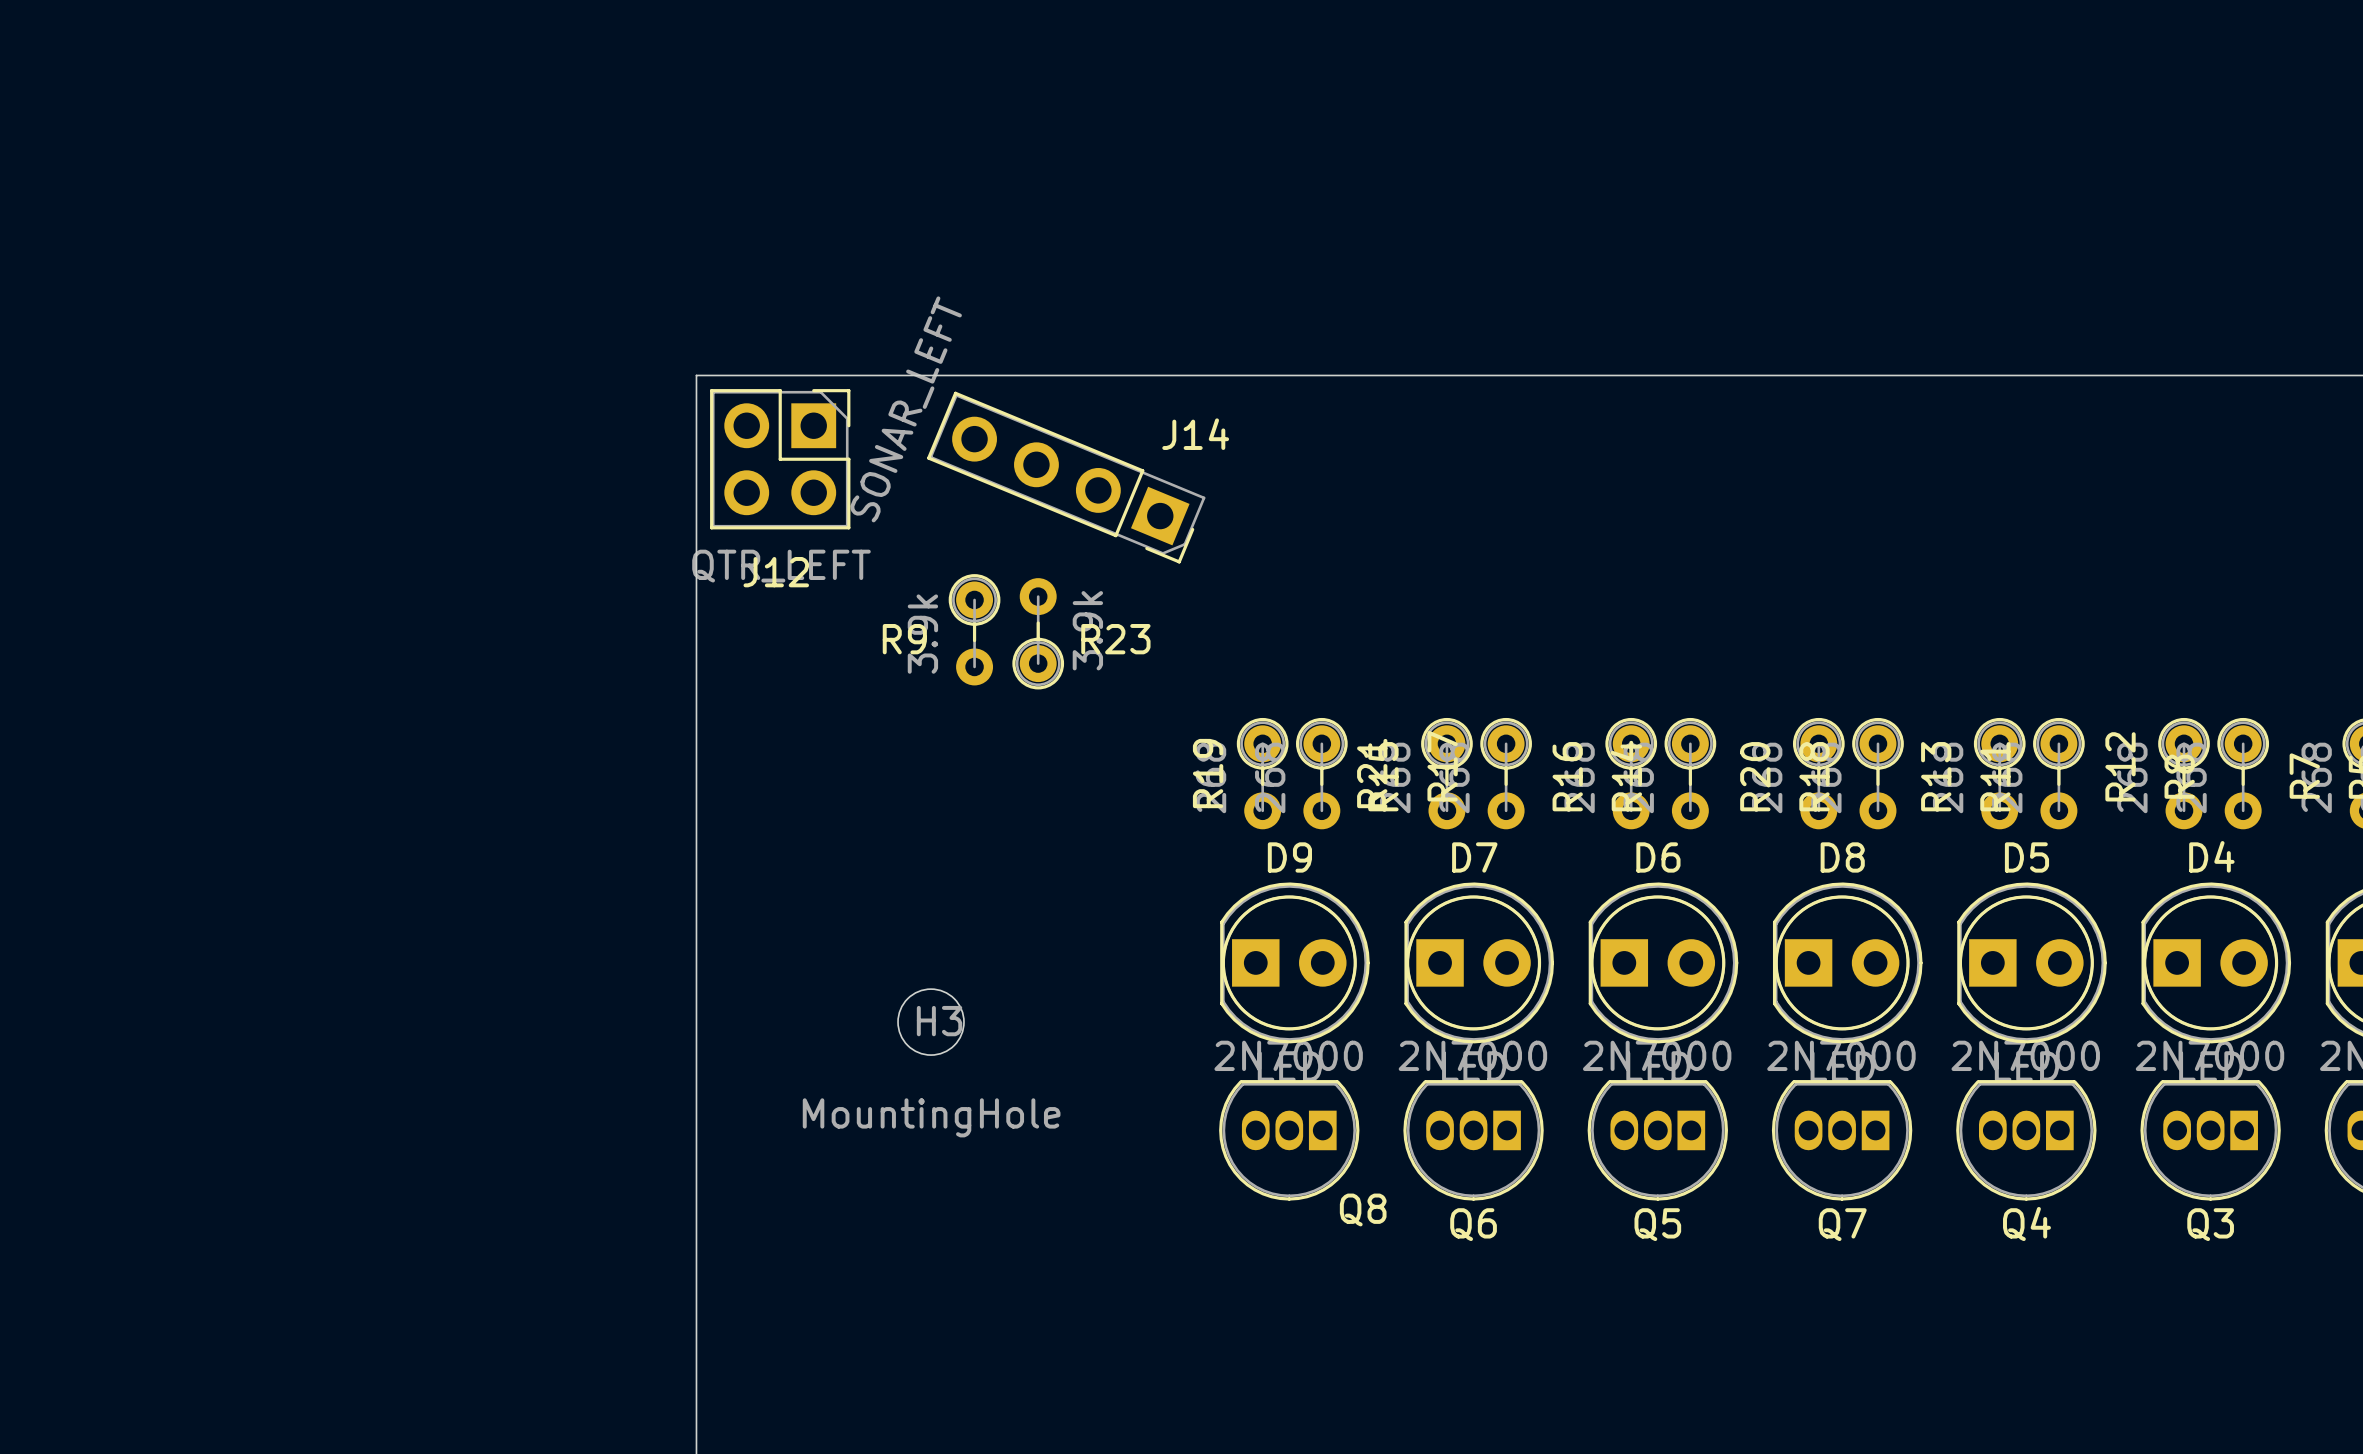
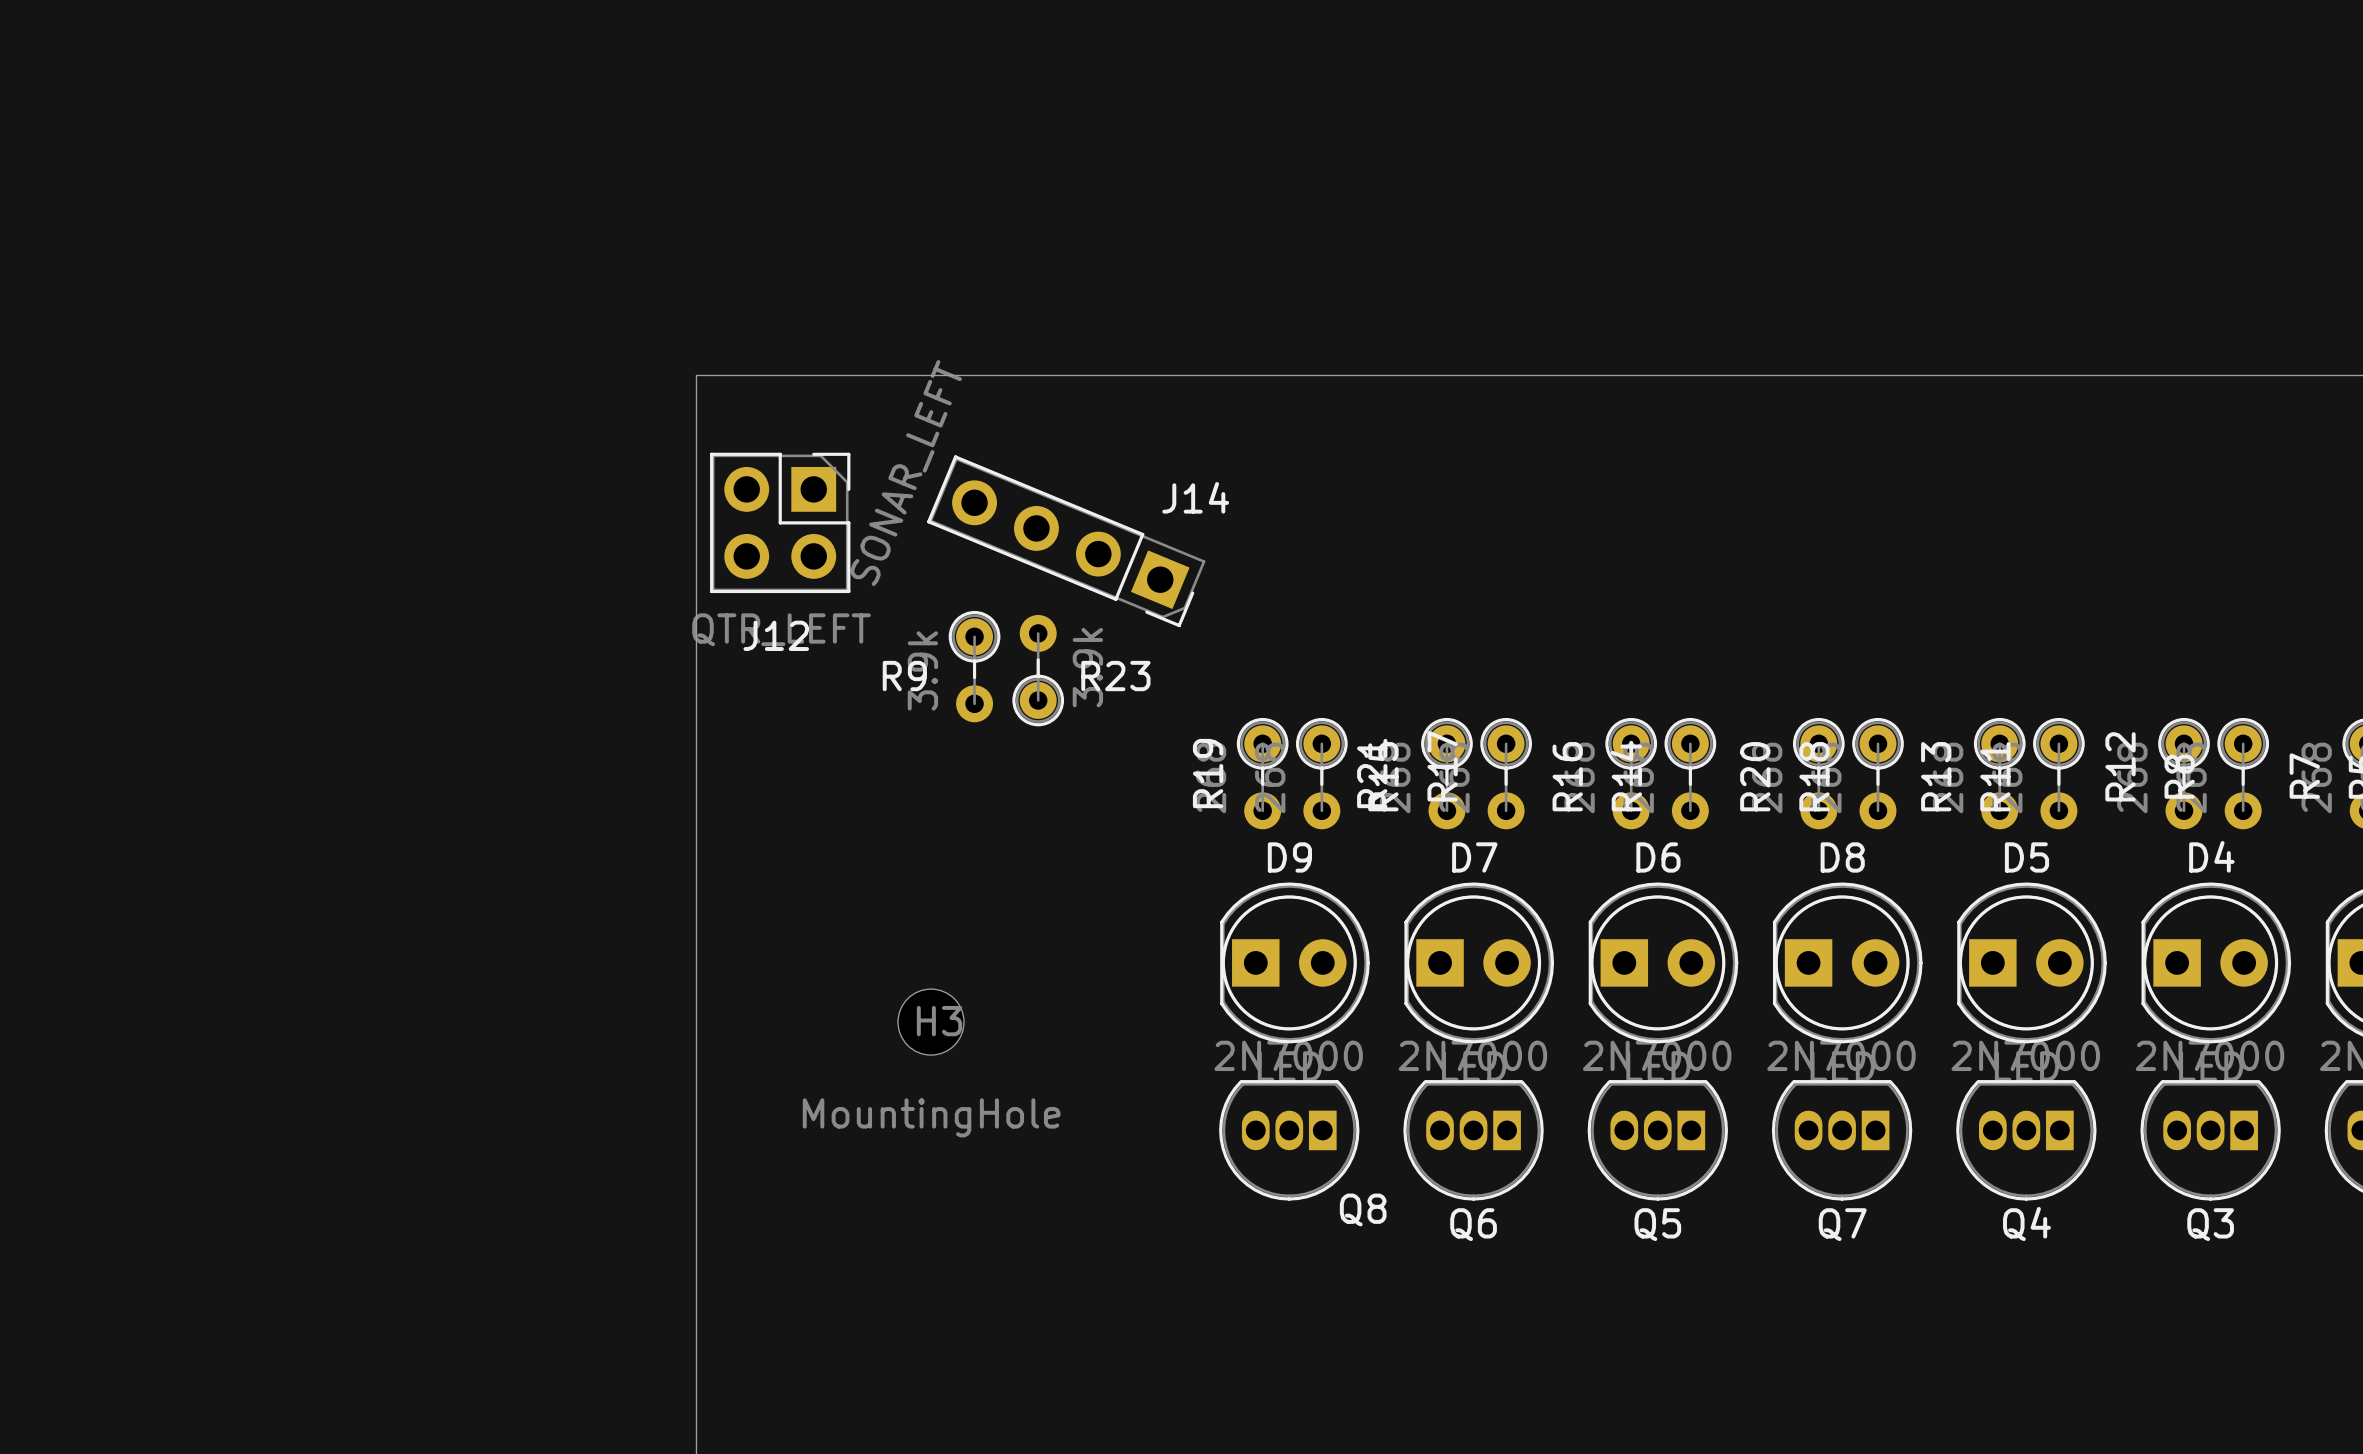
J12 position: (780, 459) -> (780, 522)
J14 position: (1066, 477) -> (1066, 541)
R9 position: (974, 629) -> (974, 666)
R23 position: (1038, 633) -> (1038, 670)

